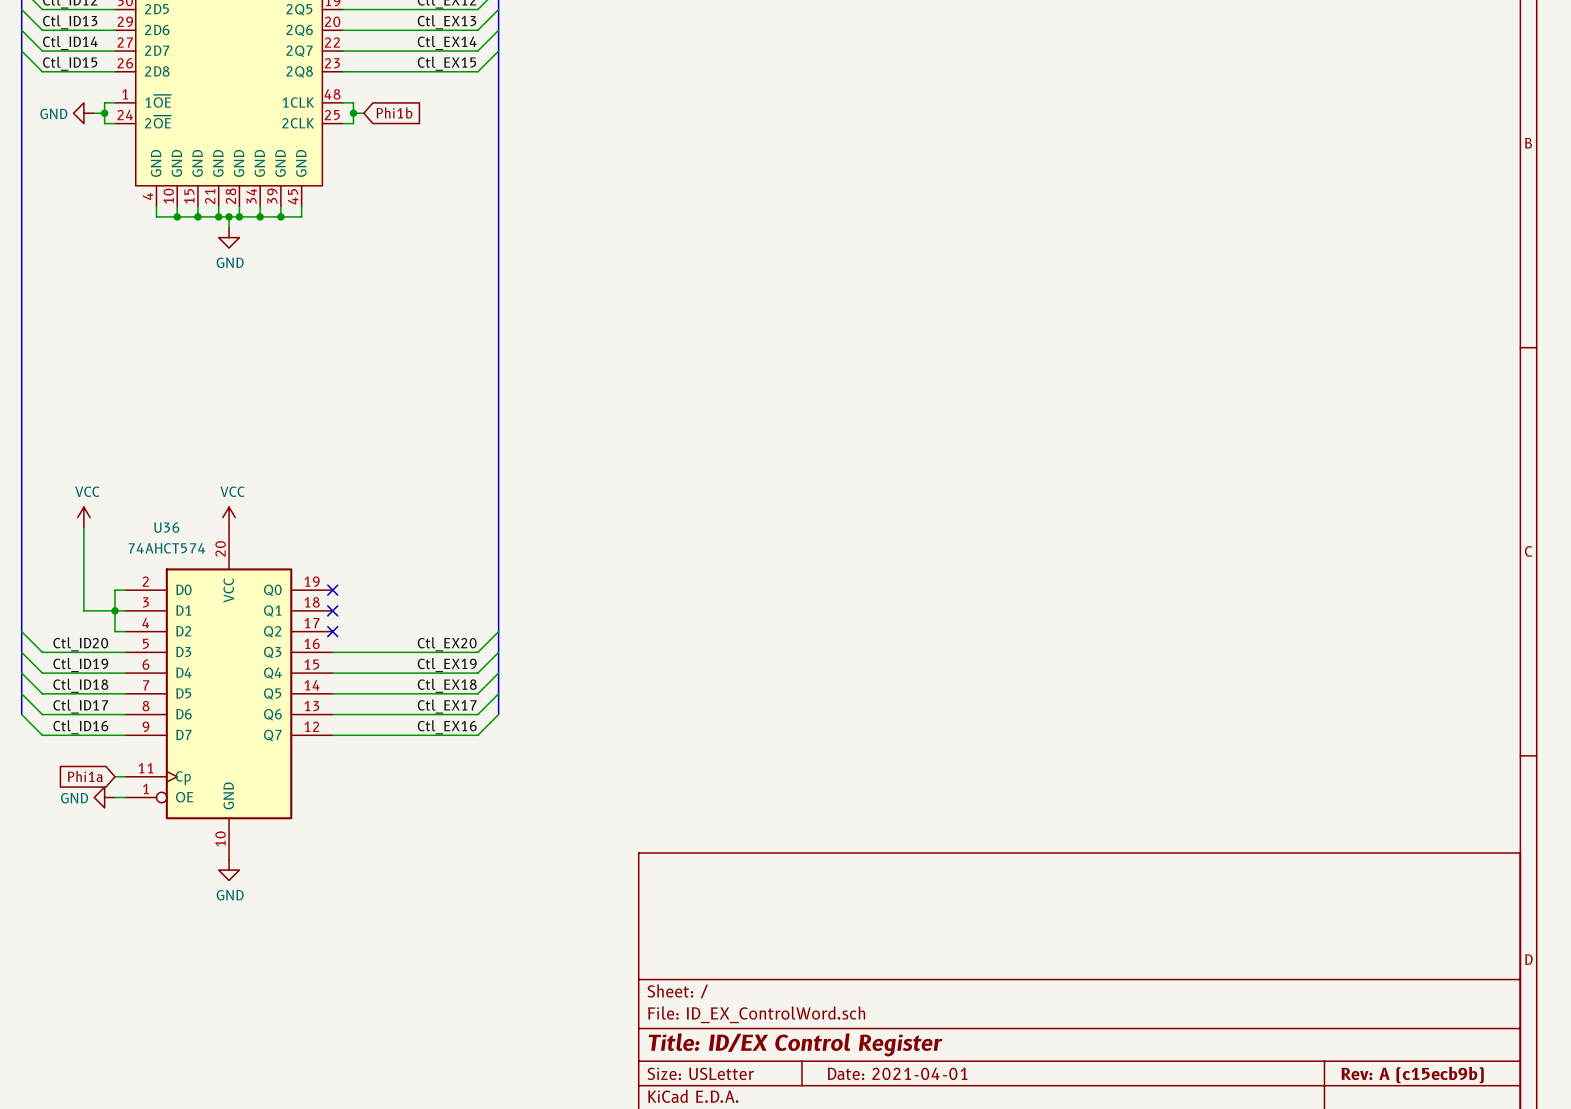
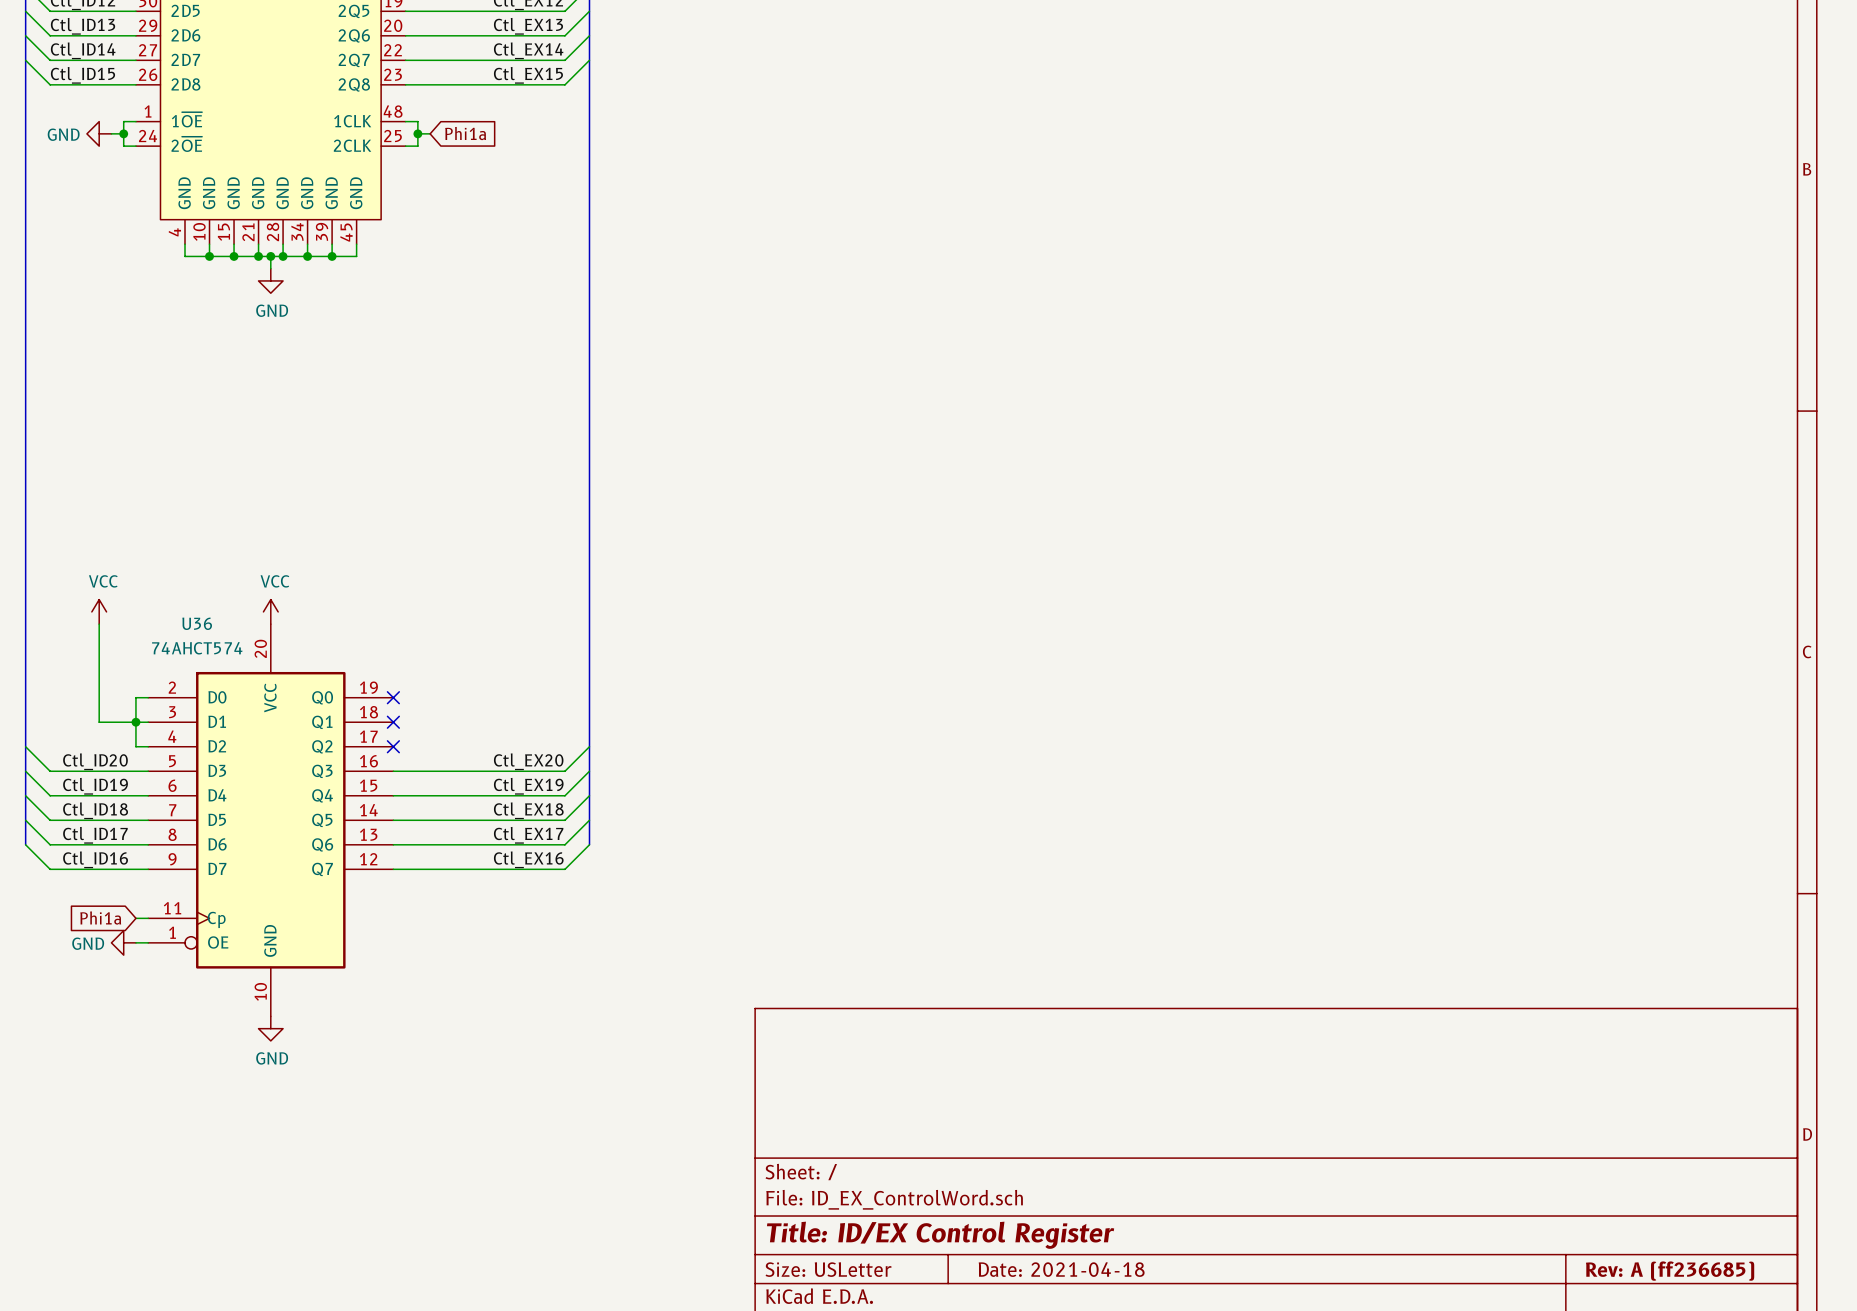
global label: Phi1b (394, 112) -> Phi1a (465, 133)
title block: Date: 2021-04-01 (897, 1073) -> Date: 2021-04-18 (1061, 1269)
title block: Rev: A (c15ecb9b) (1412, 1075) -> Rev: A (ff236685) (1670, 1271)

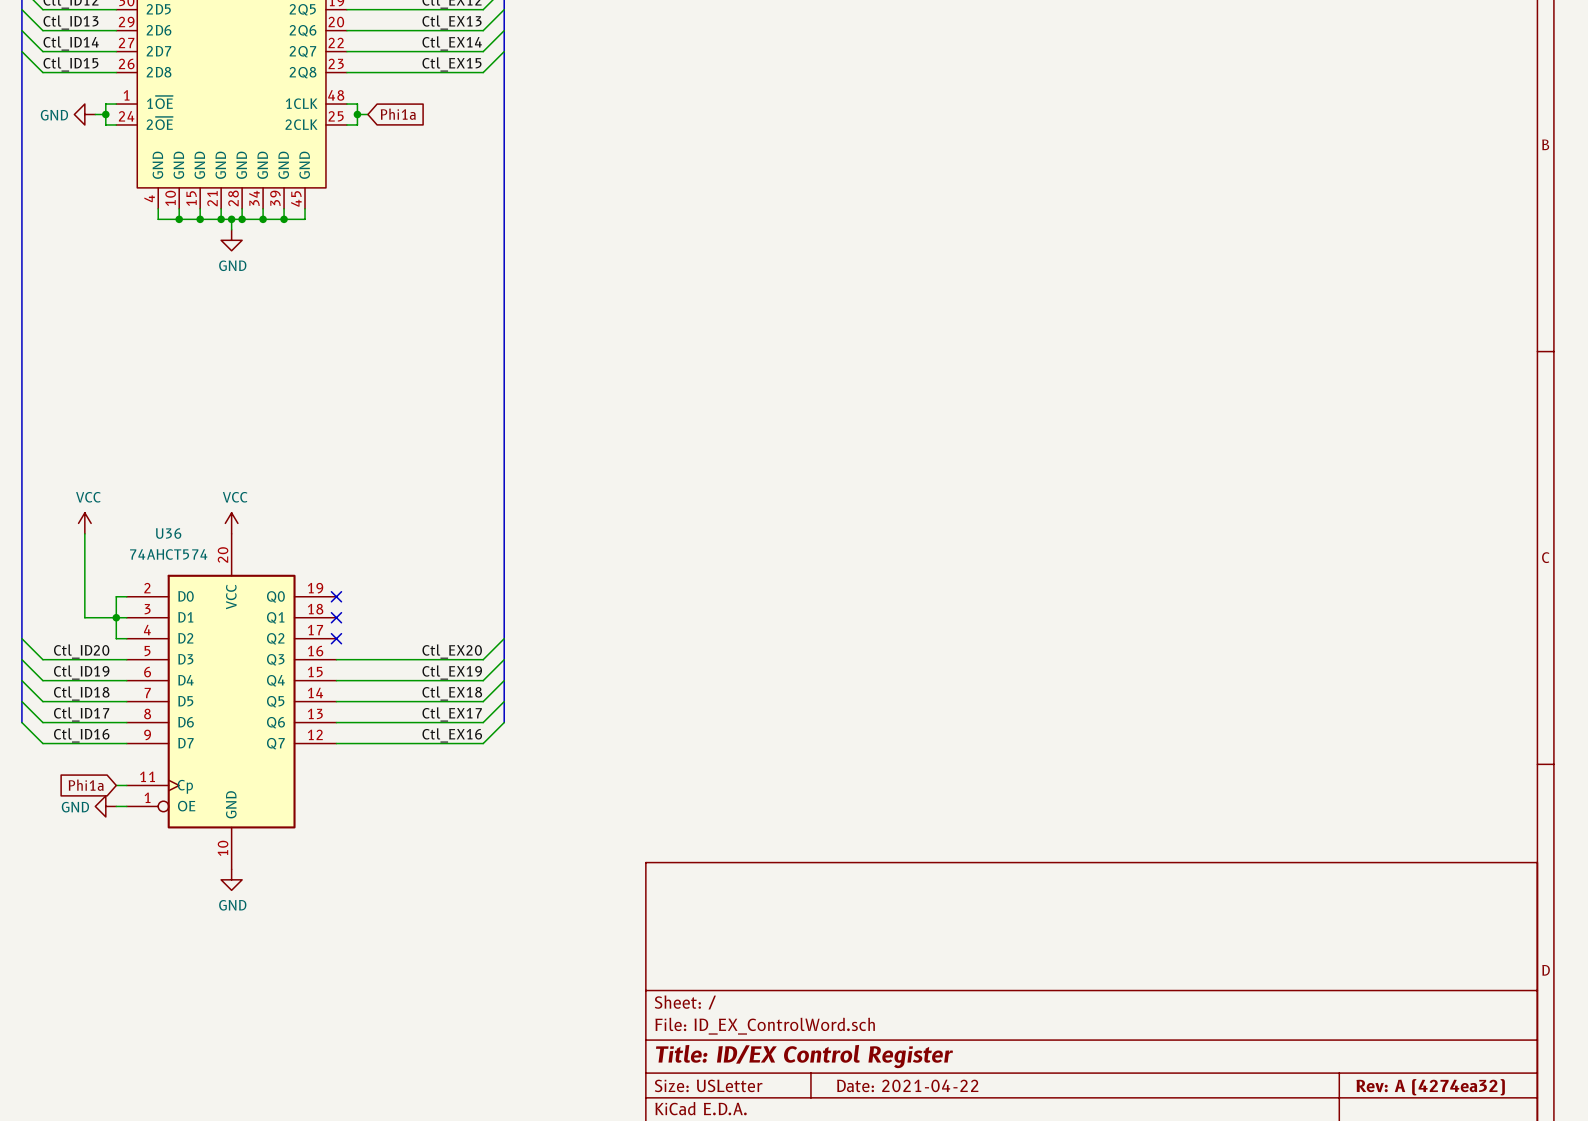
title block: Date: 2021-04-18 (1061, 1269) -> Date: 2021-04-22 (907, 1085)
title block: Rev: A (ff236685) (1670, 1271) -> Rev: A (4274ea32) (1430, 1087)

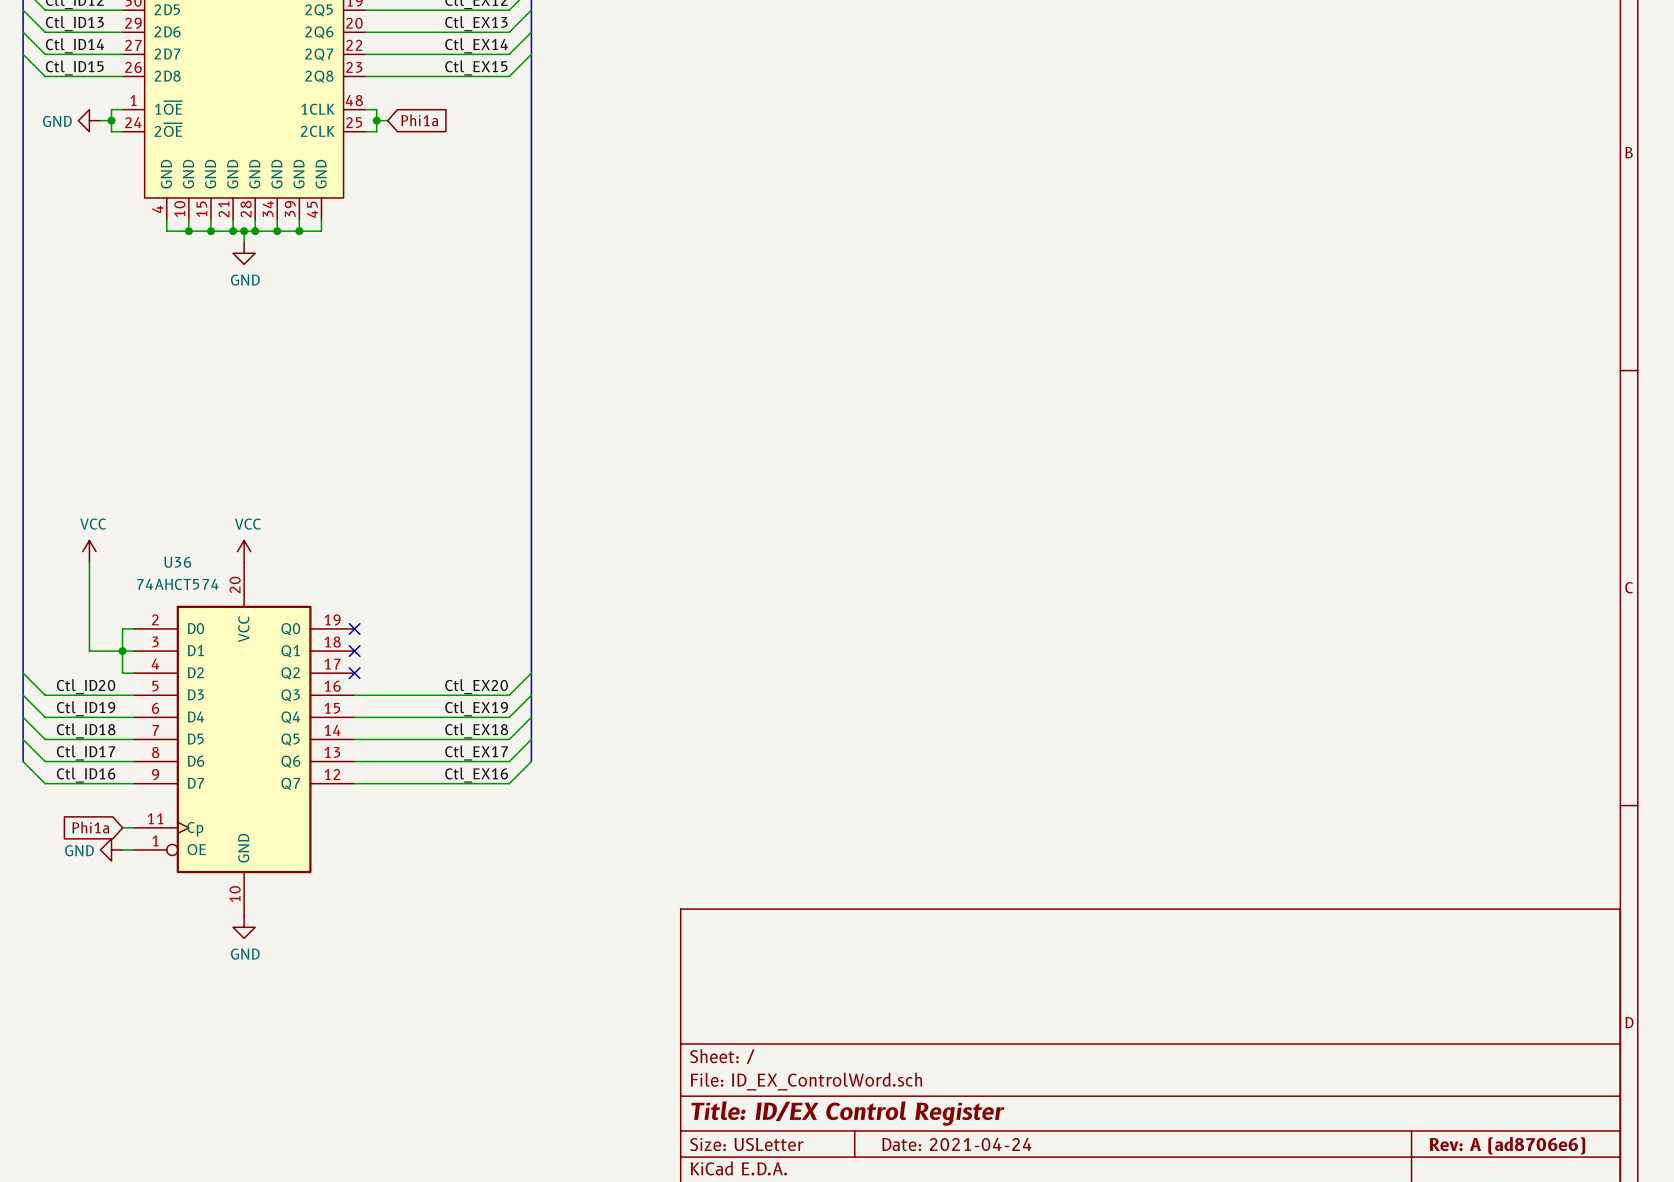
title block: Date: 2021-04-22 (907, 1085) -> Date: 2021-04-24 (956, 1144)
title block: Rev: A (4274ea32) (1430, 1087) -> Rev: A (ad8706e6) (1507, 1145)

